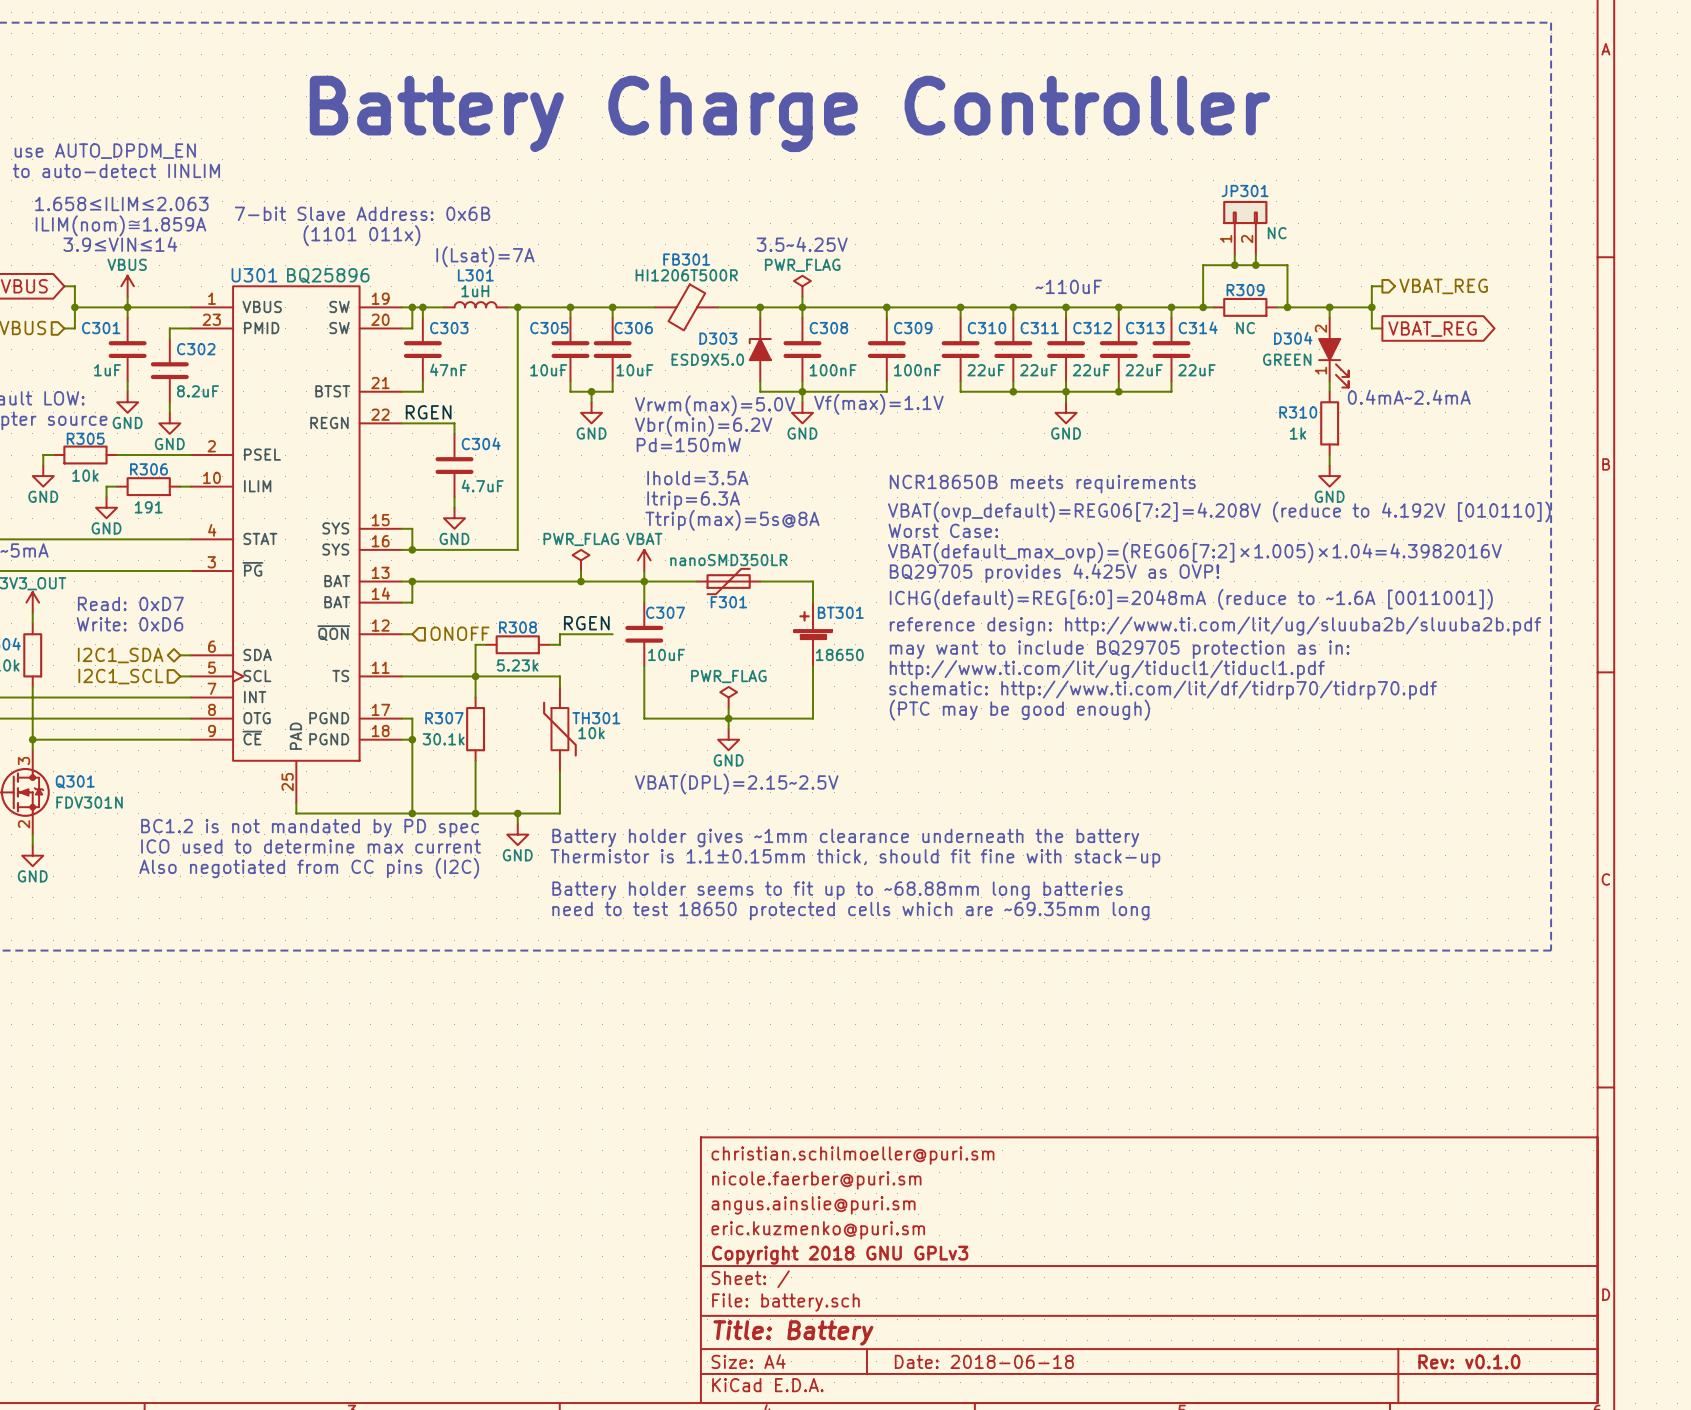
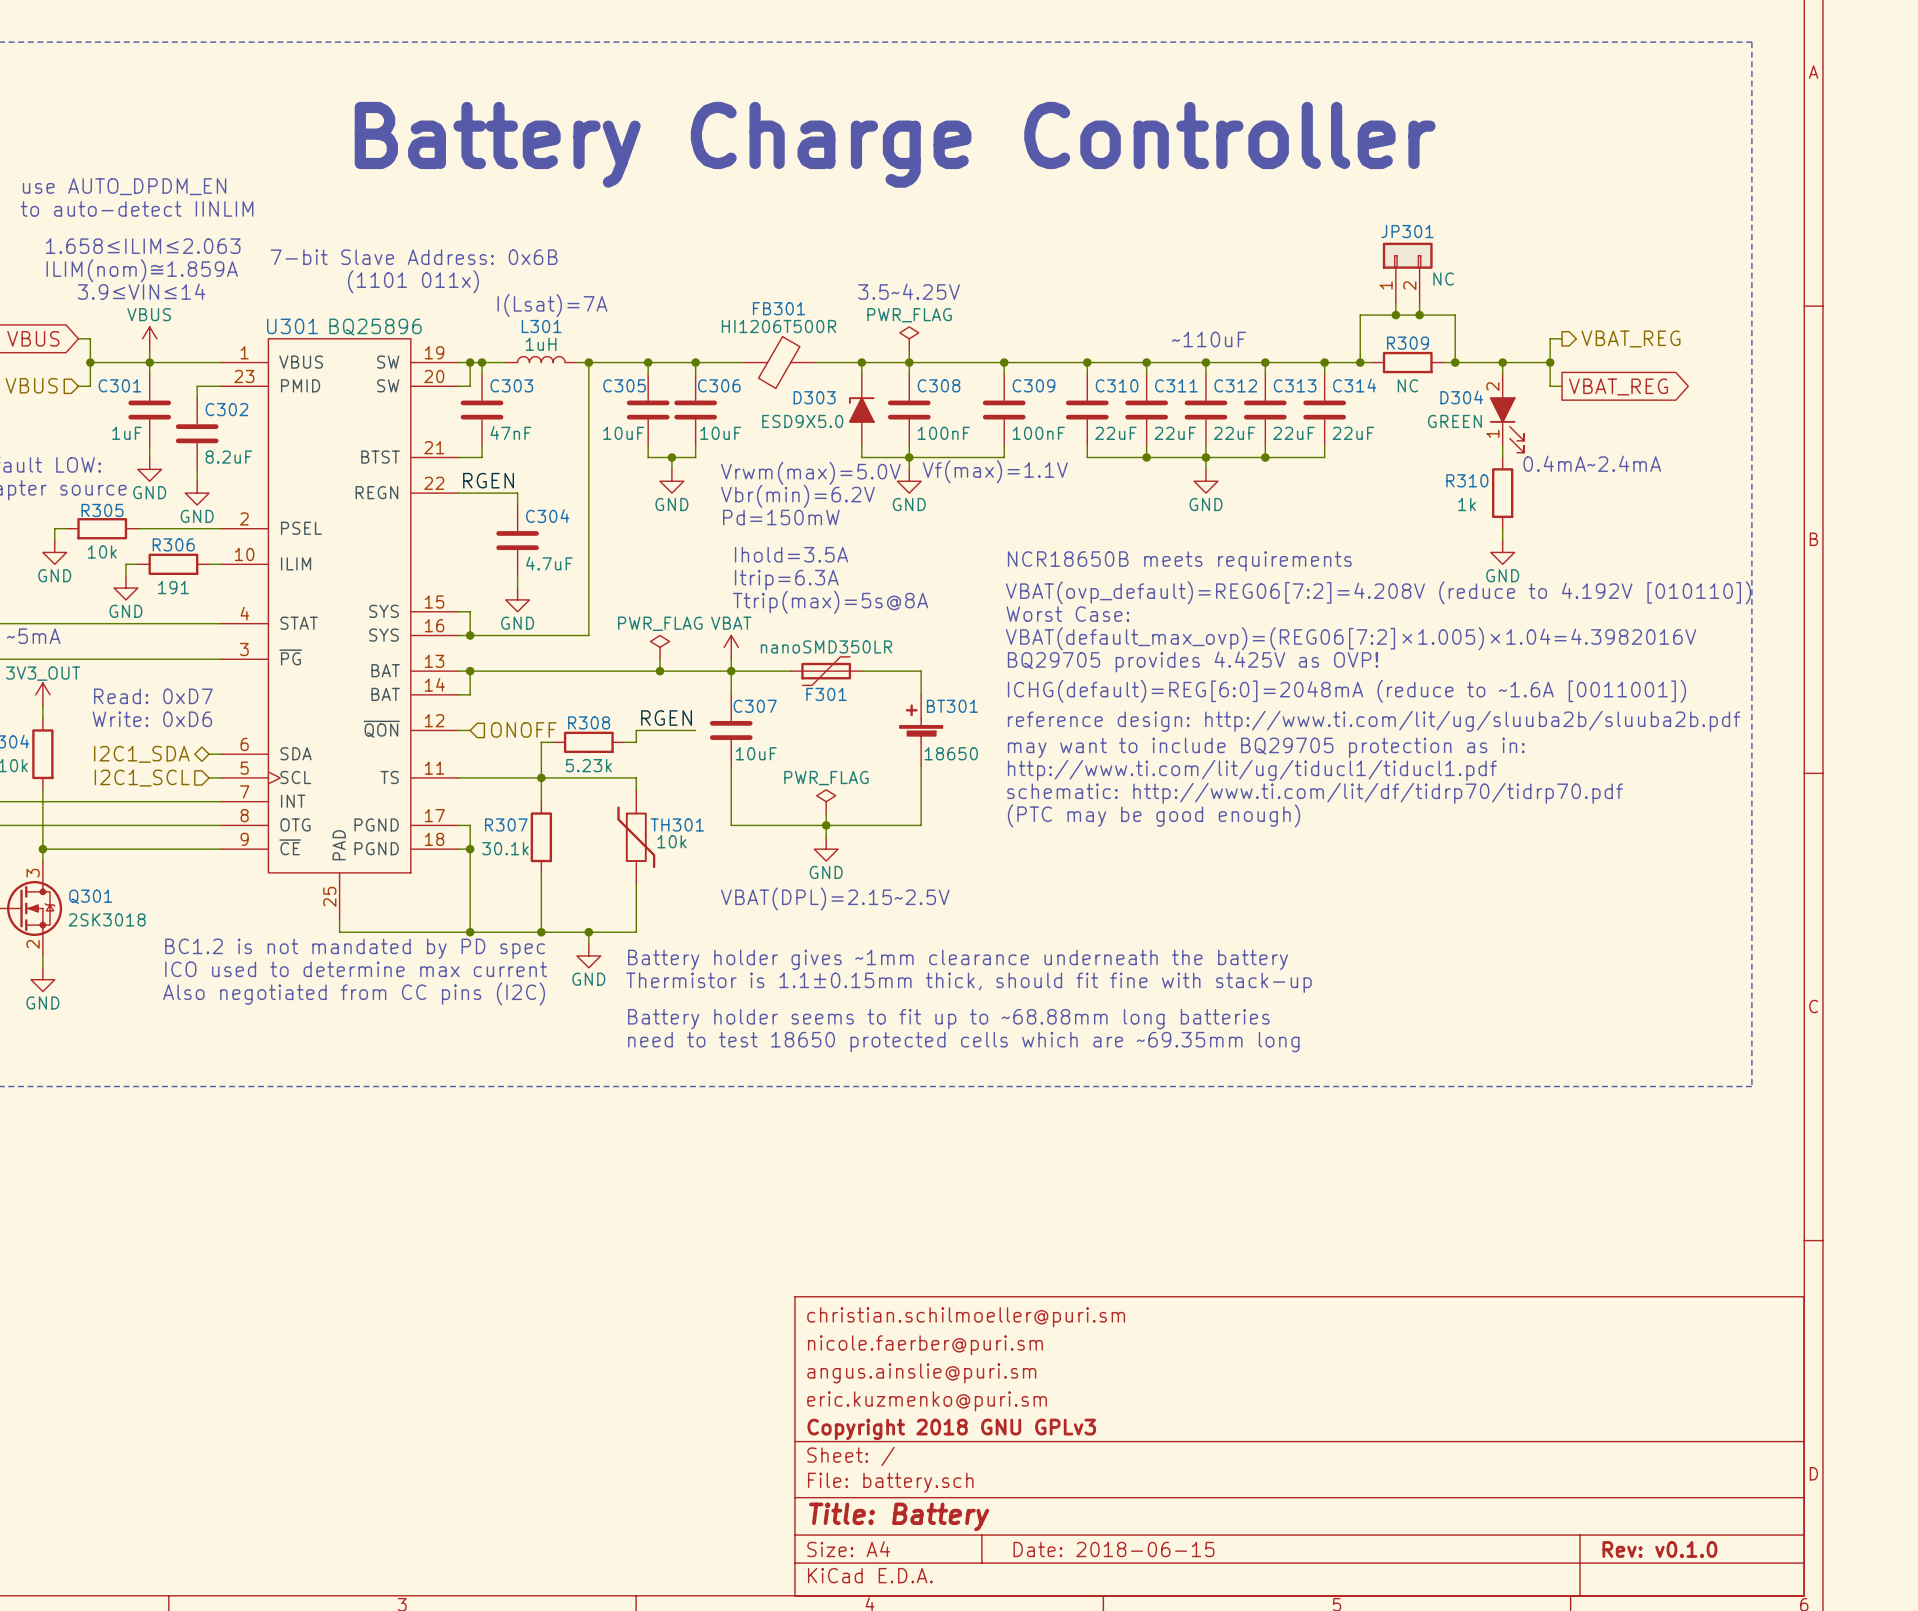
Q301 value: FDV301N (89, 802) -> 2SK3018 (107, 919)
title block: Date: 2018-06-18 (984, 1361) -> Date: 2018-06-15 (1114, 1549)

